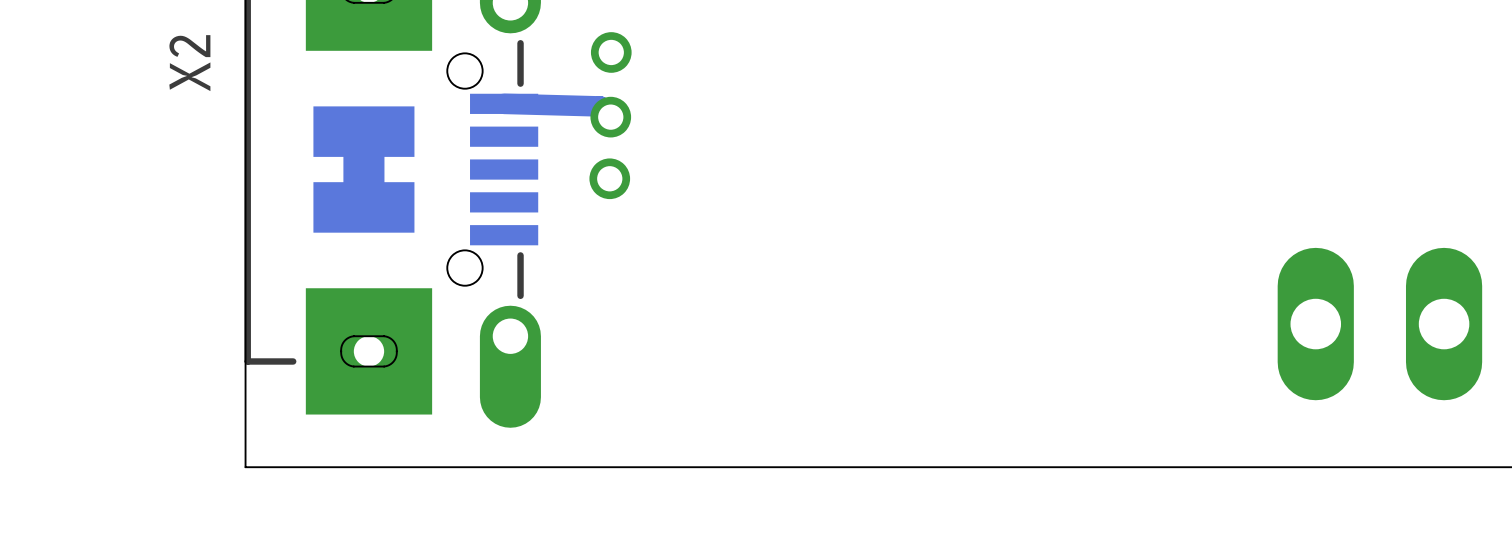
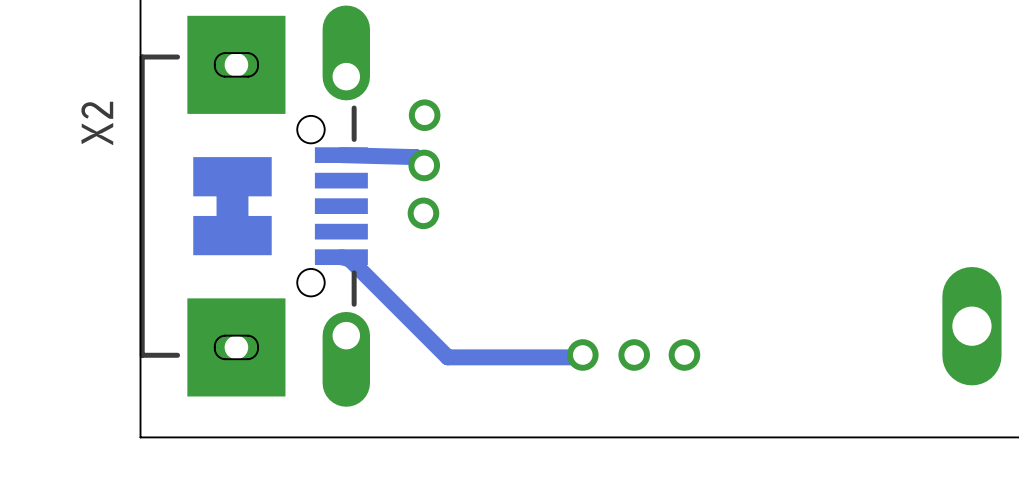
track: none -> (341, 257) (349, 259) (447, 357) (580, 357) (582, 354)
via: none -> (582, 354)
via: none -> (634, 354)
via: none -> (684, 354)

